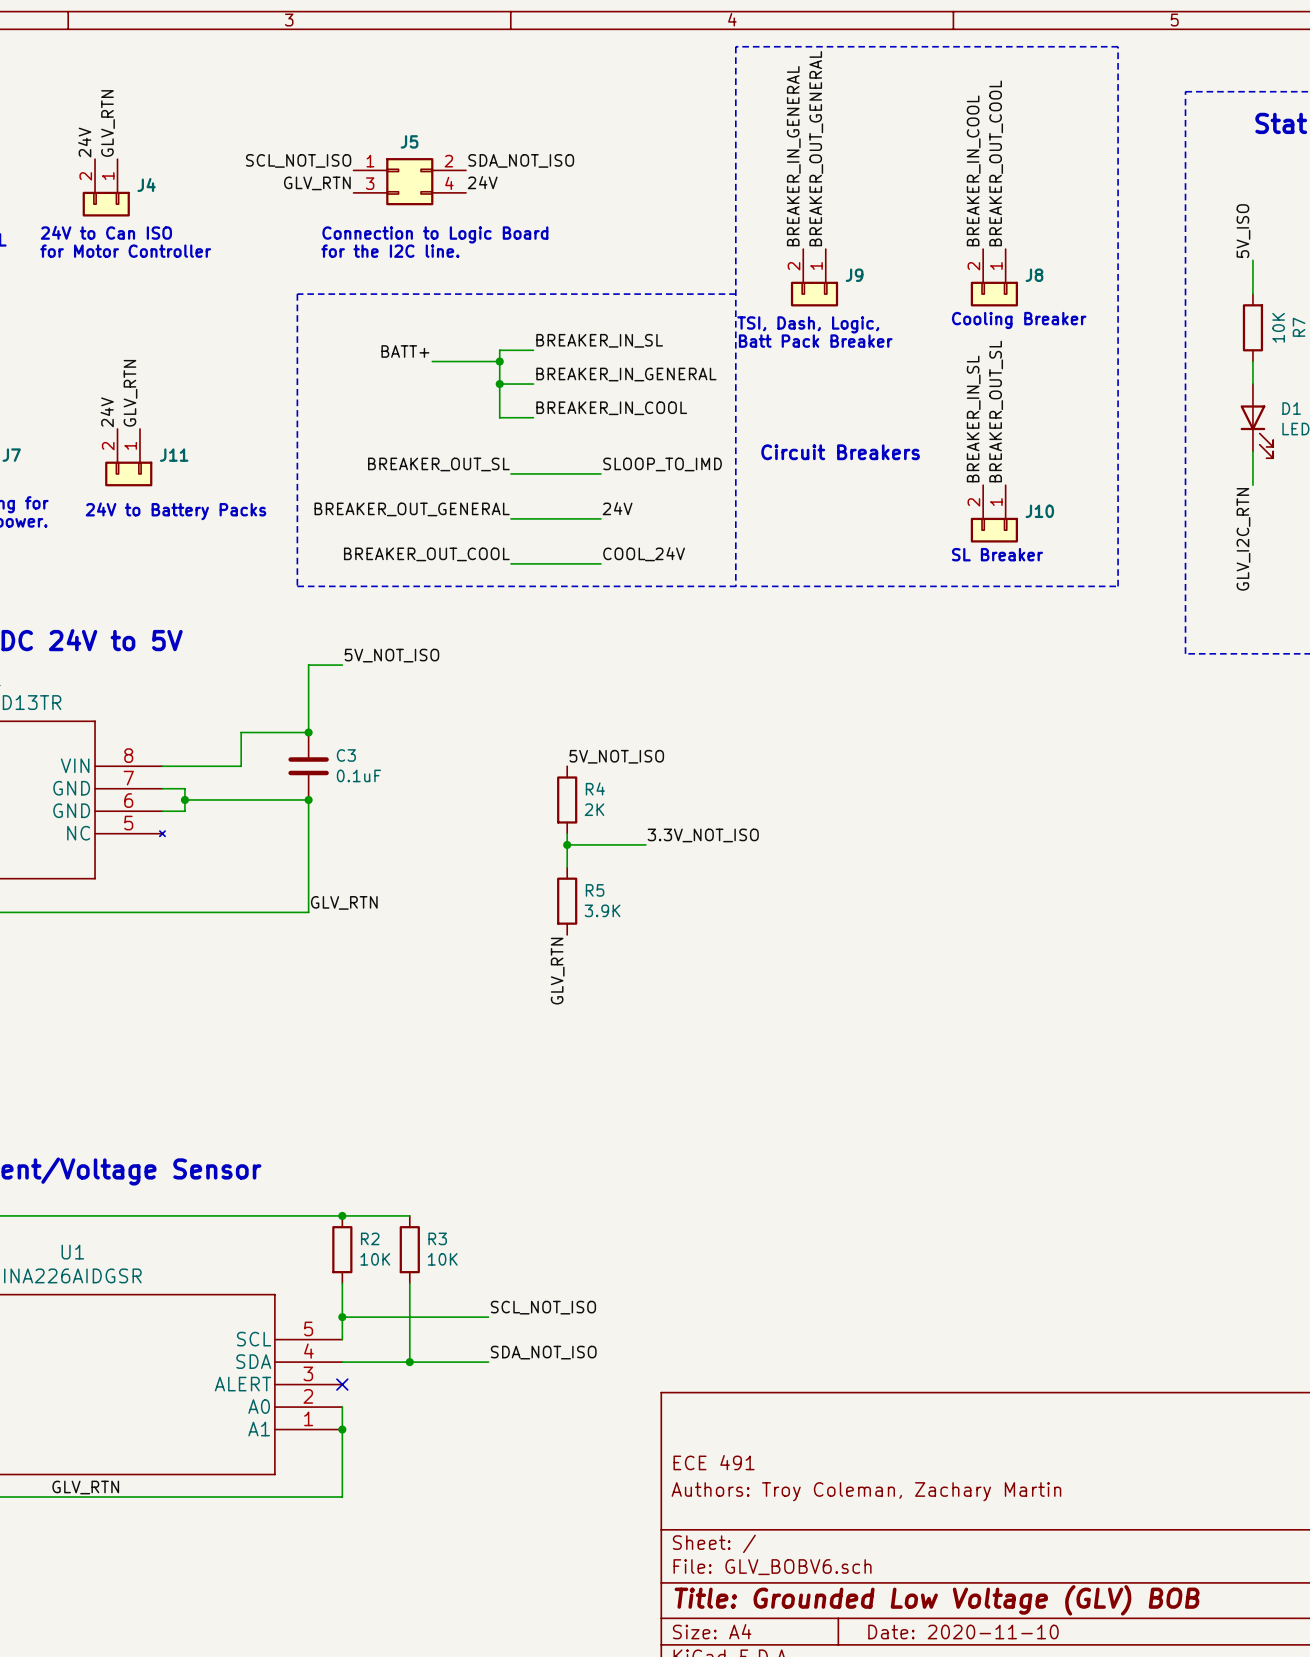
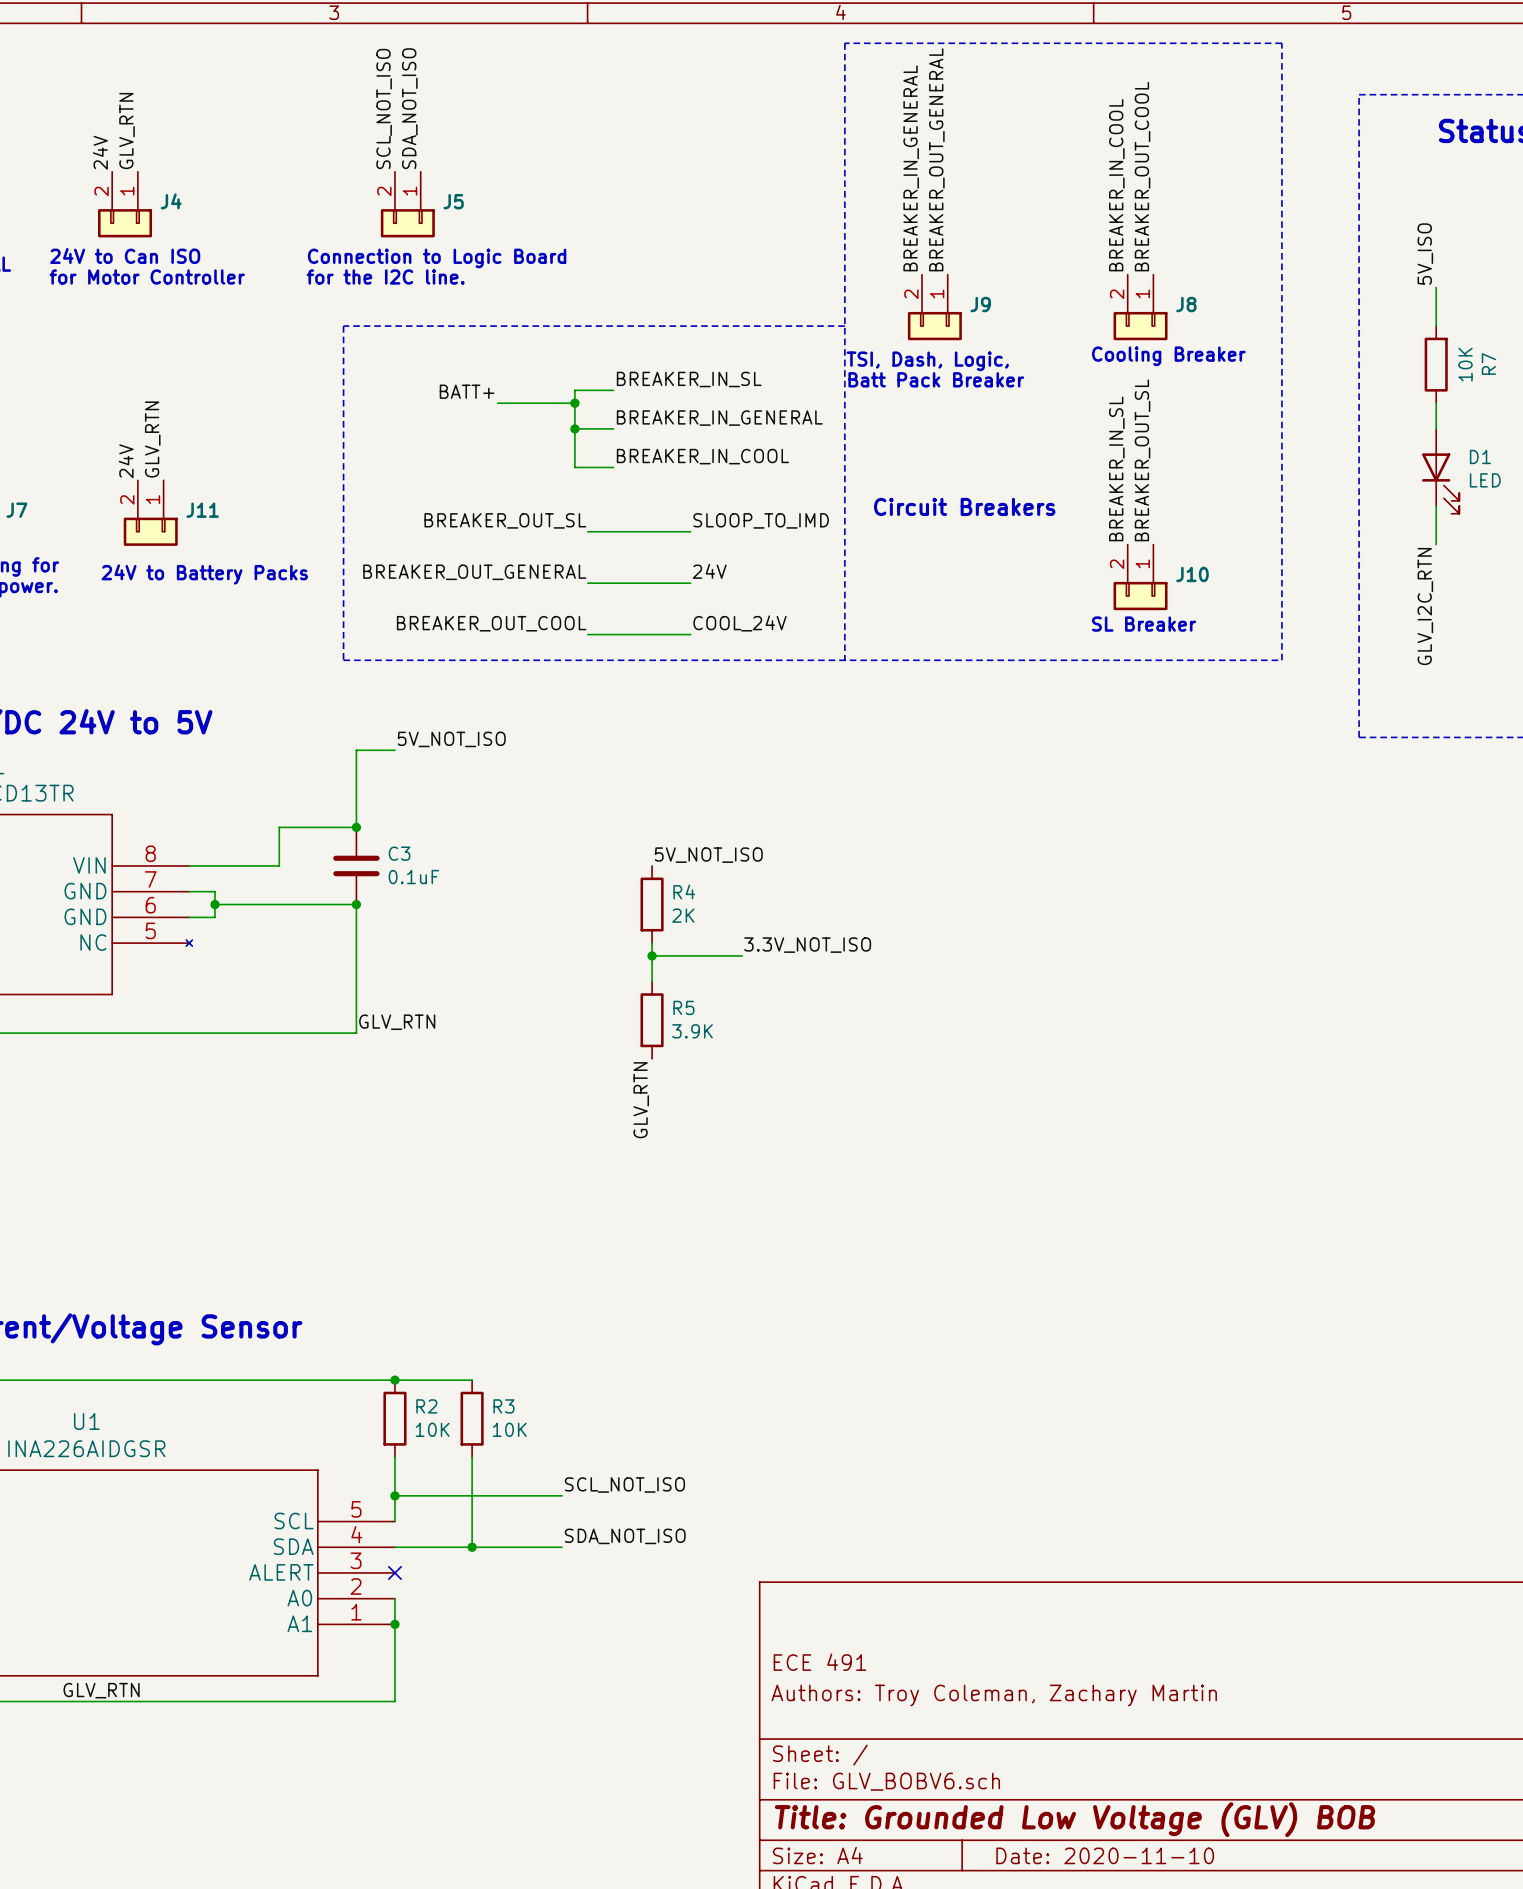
J5 name position: J5 (409, 141) -> J5 (453, 201)
J5 symbol: [353, 158, 467, 206] -> [380, 171, 435, 238]
label rotation: 0° (298, 160) -> 90° counterclockwise (384, 108)
label rotation: 0° (521, 160) -> 90° counterclockwise (409, 108)
label position: SDA_NOT_ISO (521, 160) -> SDA_NOT_ISO (409, 108)
label: 24V (482, 182) -> none
label: GLV_RTN (317, 183) -> none
text position: Connection to Logic Board (435, 234) -> Connection to Logic Board (437, 258)
text position: for the I2C line. (390, 251) -> for the I2C line. (385, 276)

